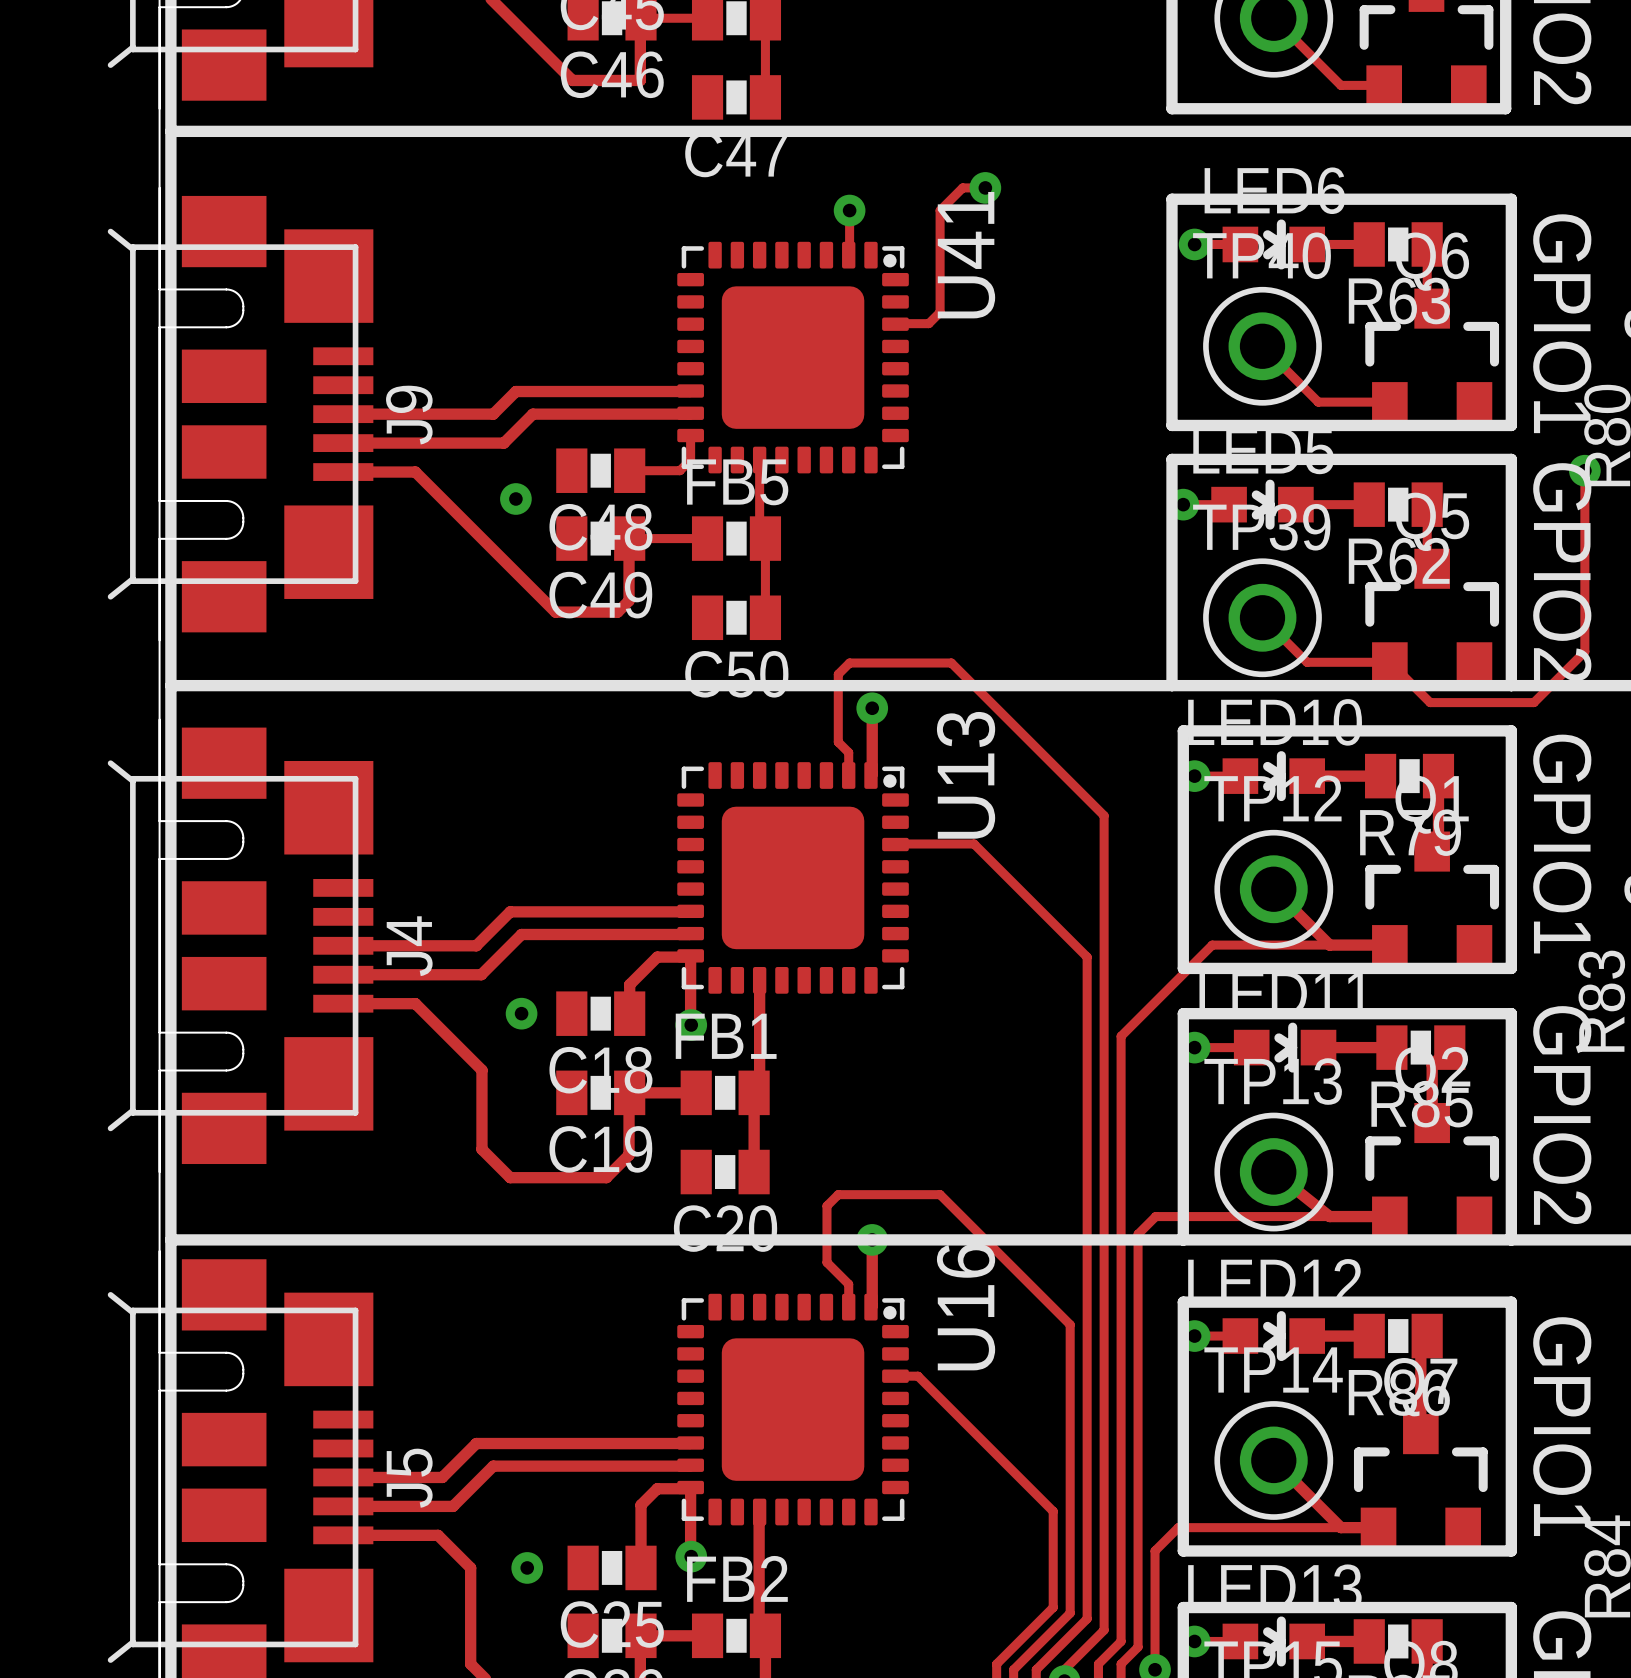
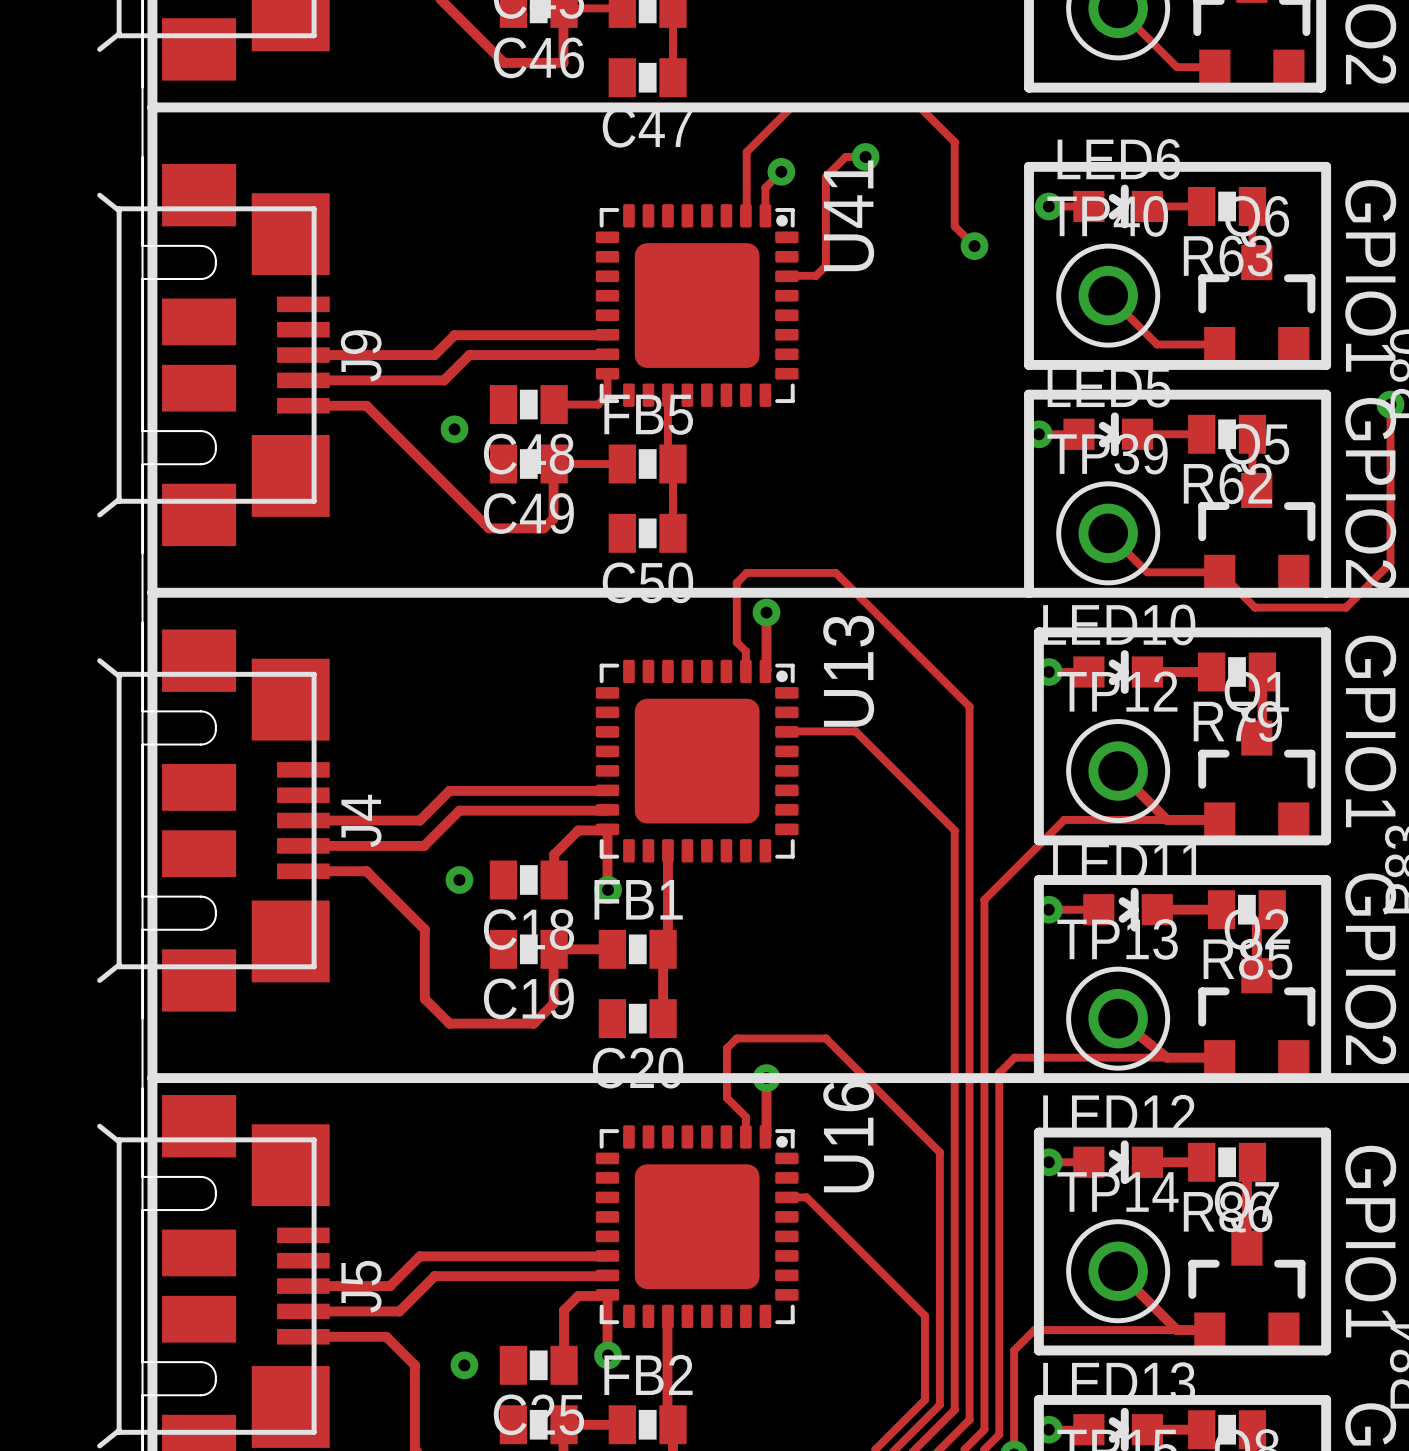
track: none -> (781, 171) (765, 187) (765, 215)
track: none -> (746, 176) (746, 152) (791, 107) (920, 107) (954, 142) (954, 226) (974, 246)
via position: (849, 210) -> (781, 171)
via: none -> (974, 246)

